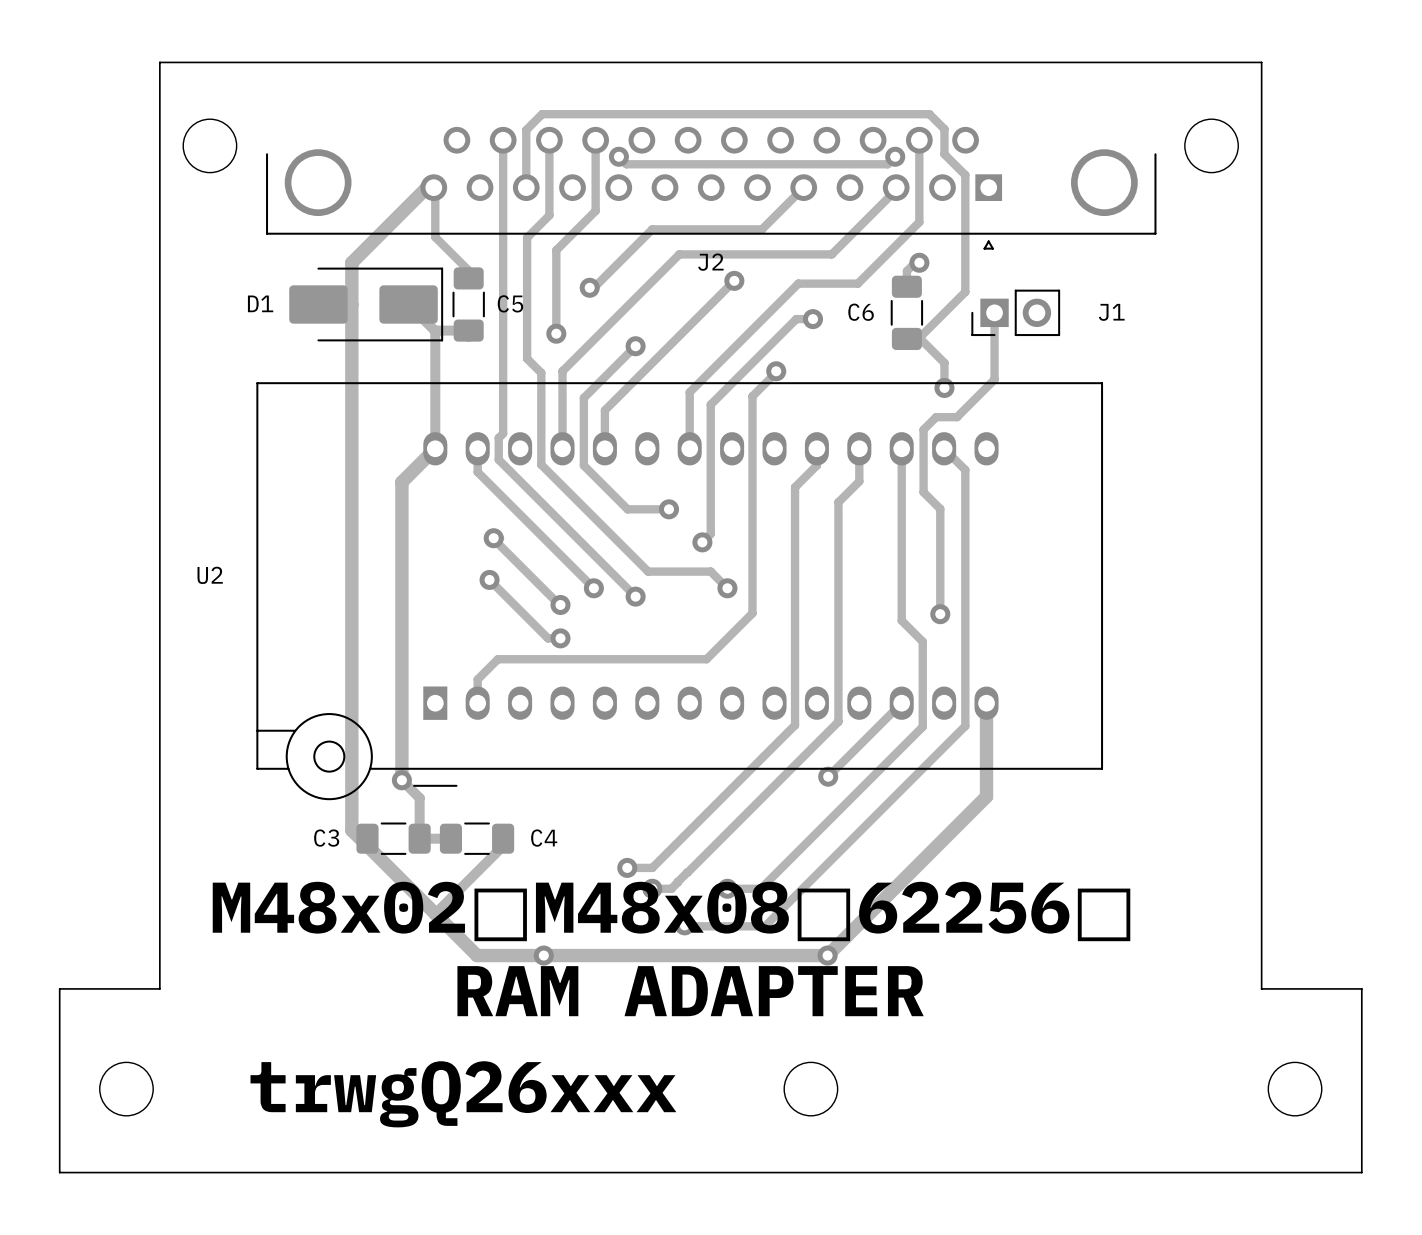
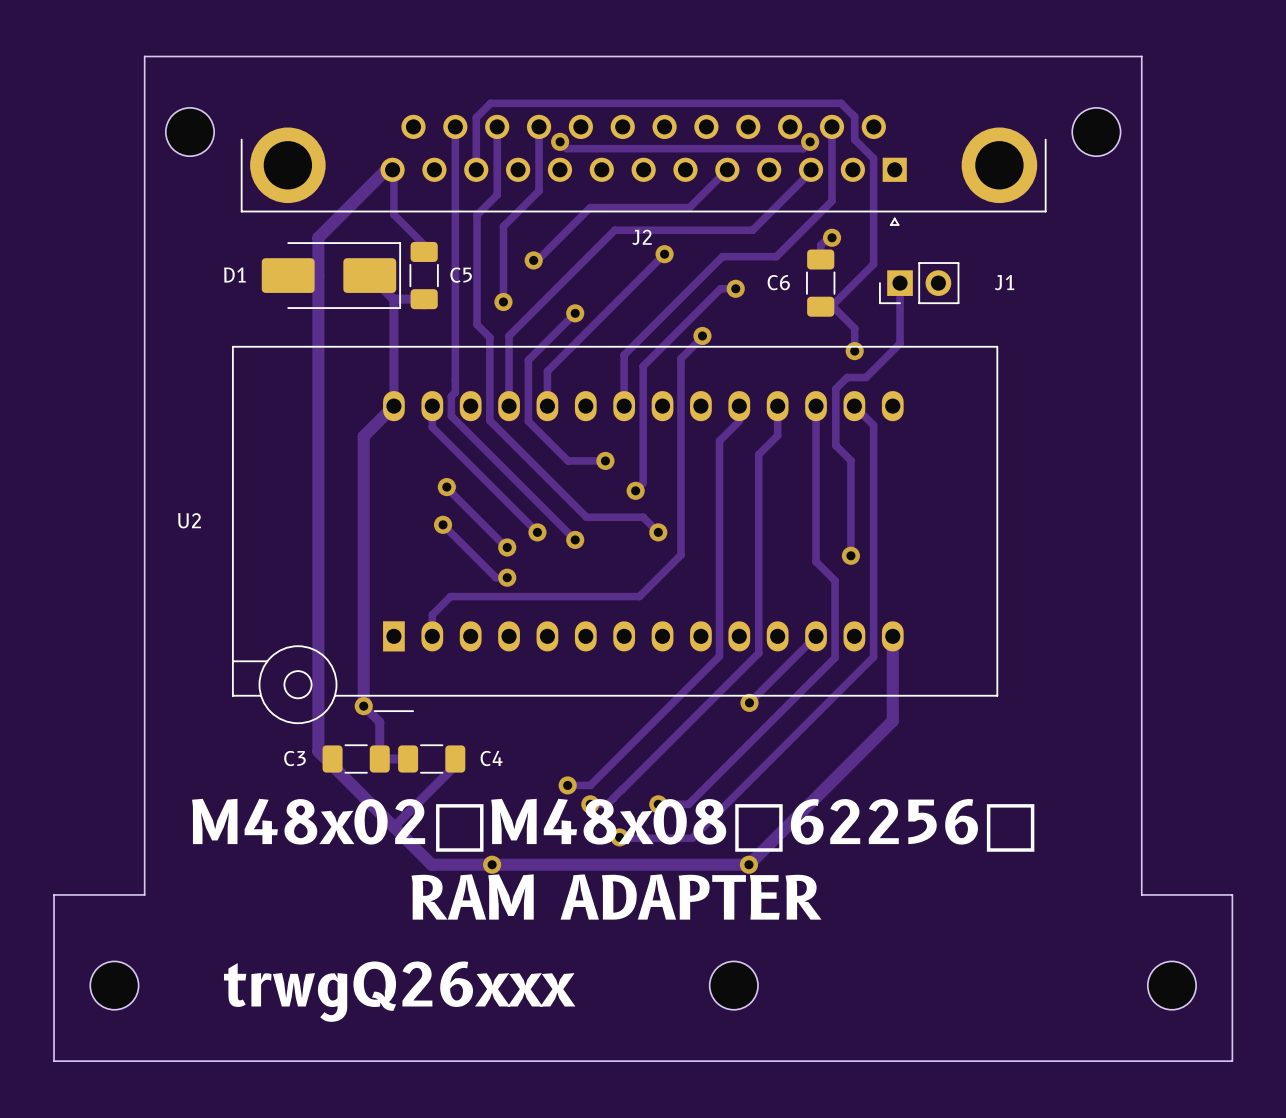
J2 footprint: [266, 126, 1157, 250] -> [240, 114, 1047, 226]

